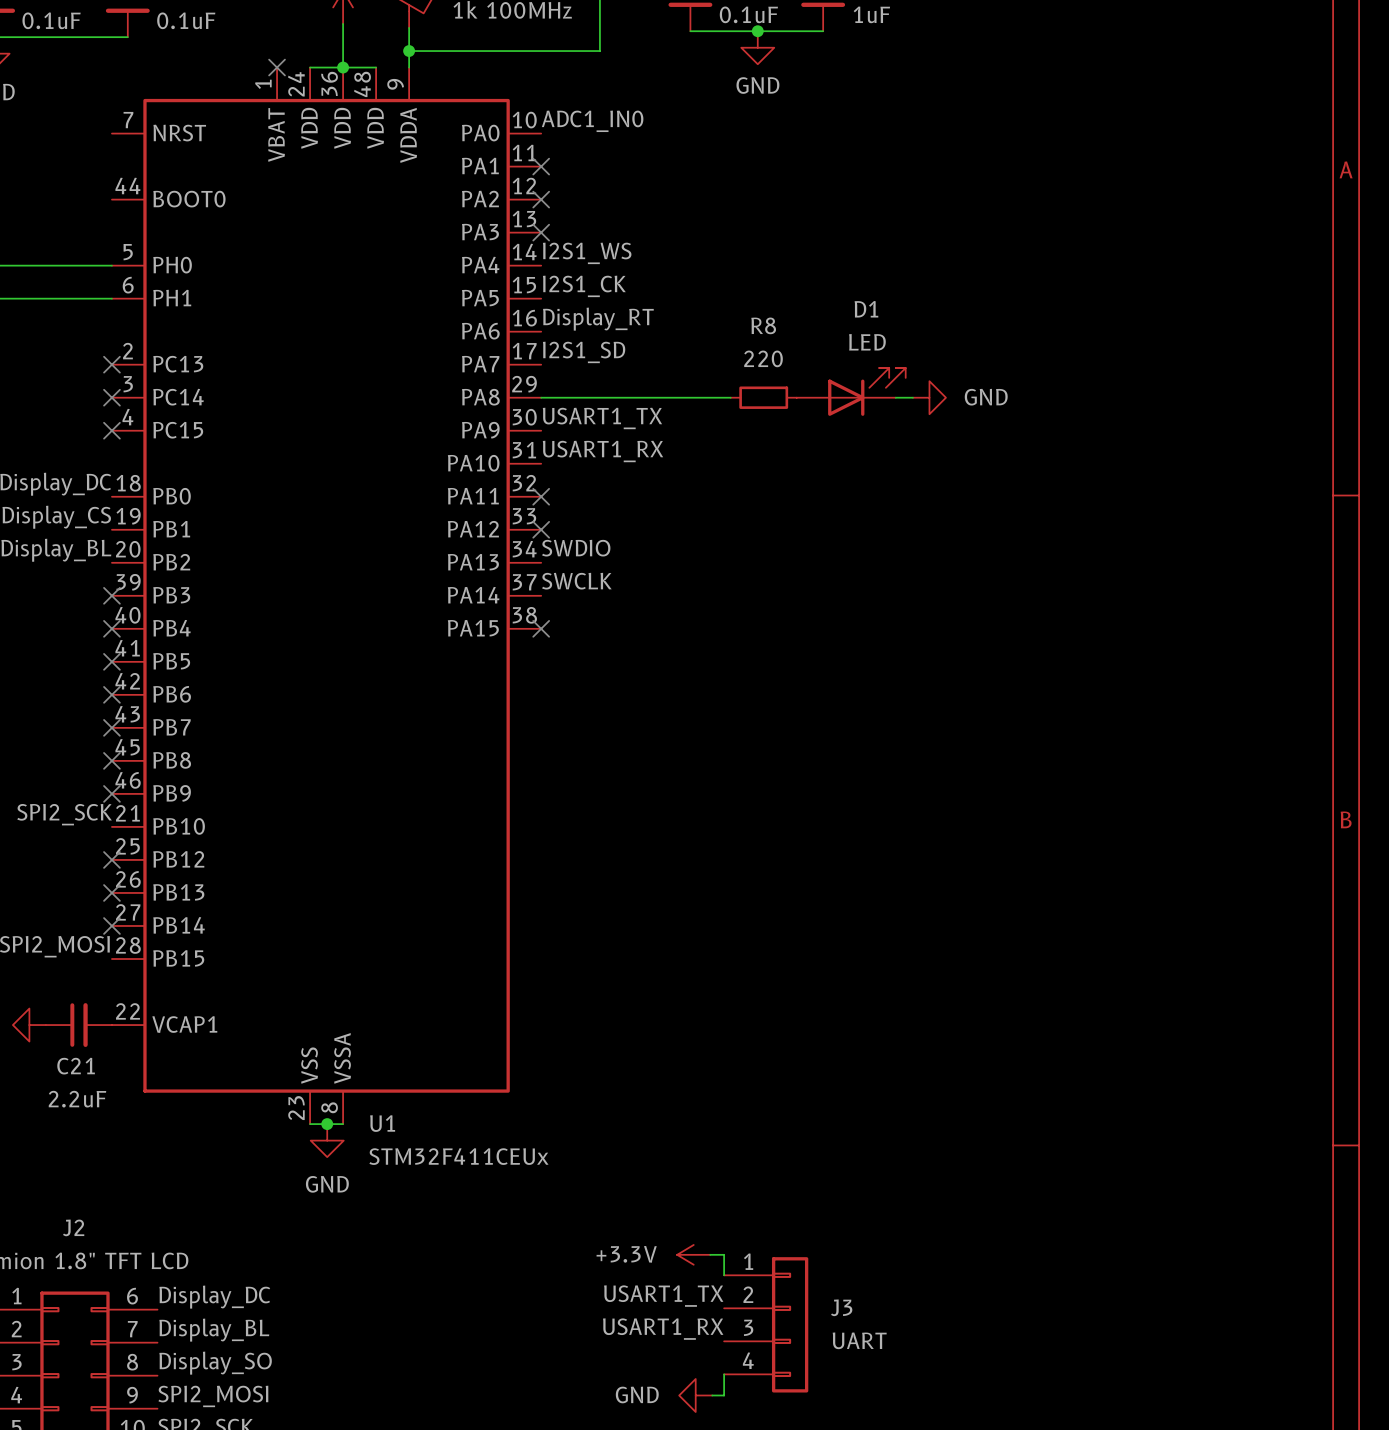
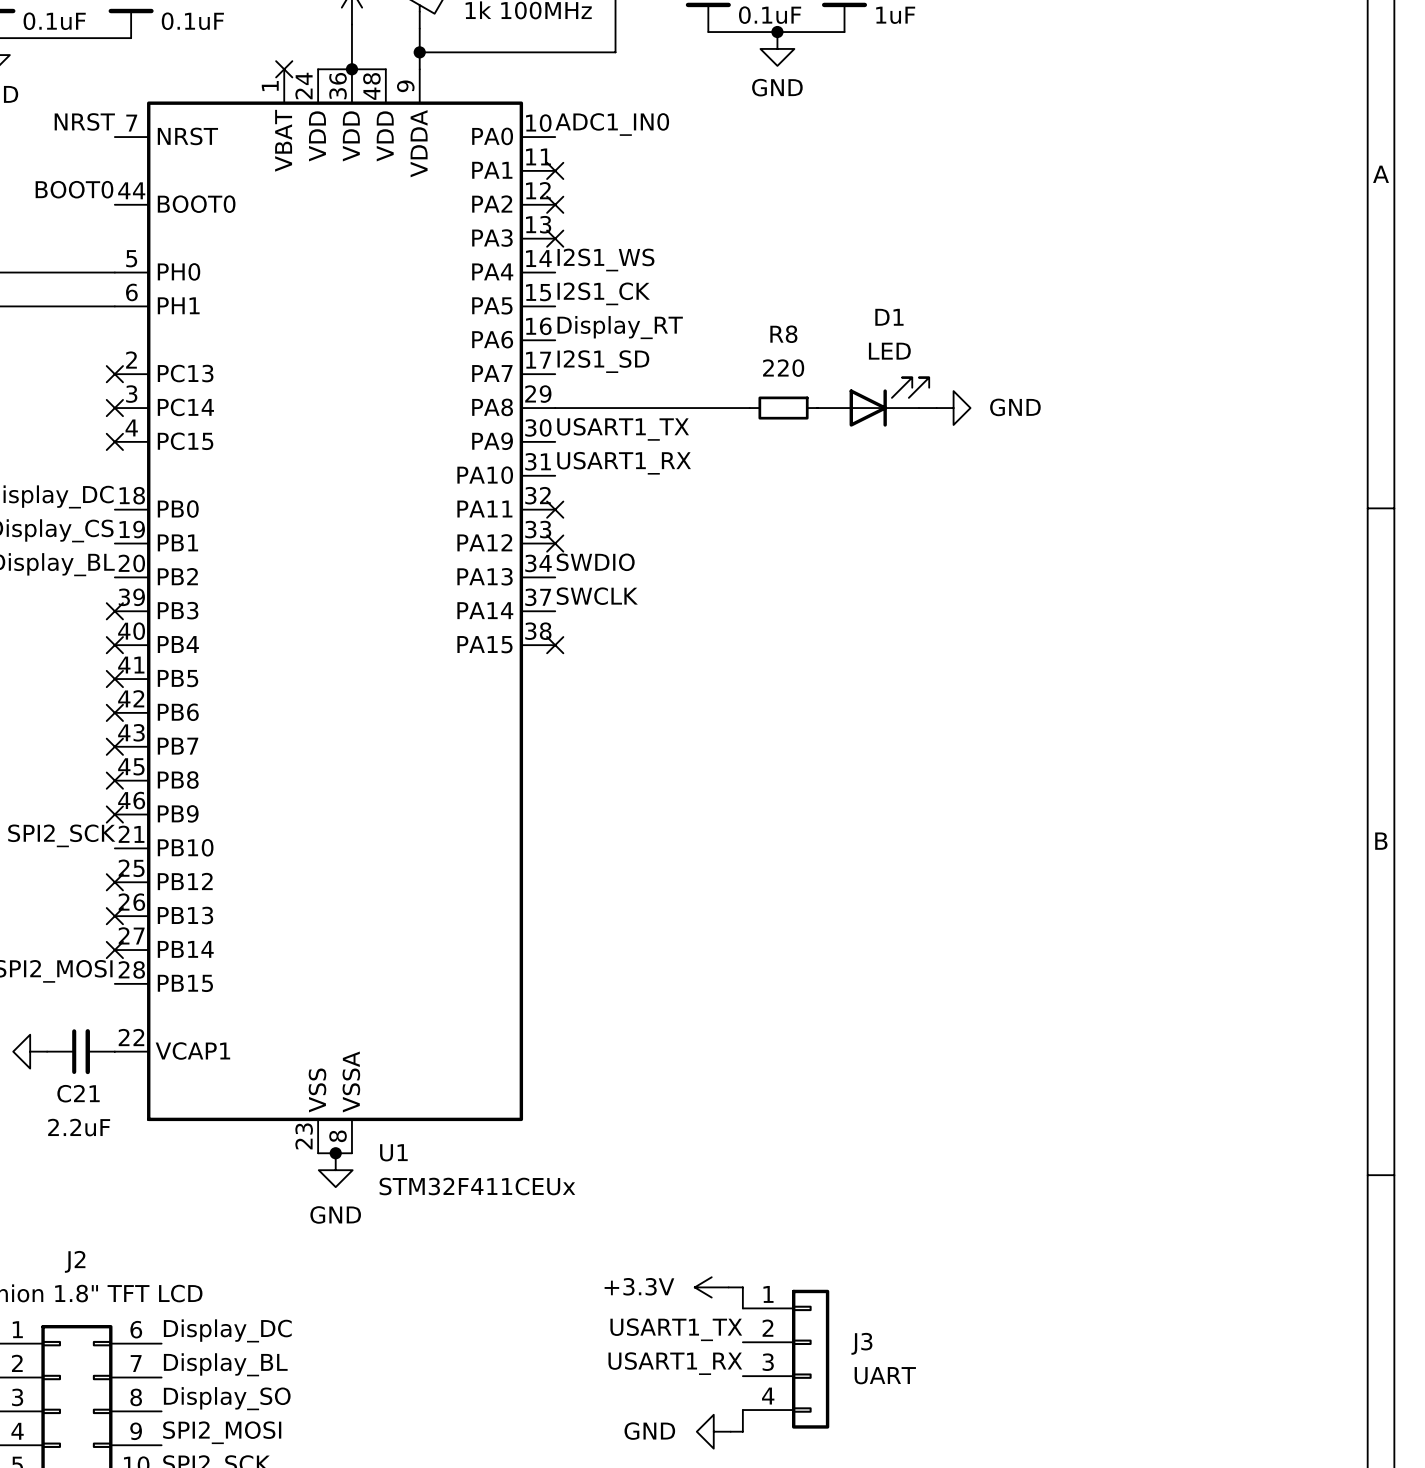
label: none -> NRST (84, 121)
label: none -> BOOT0 (74, 189)

